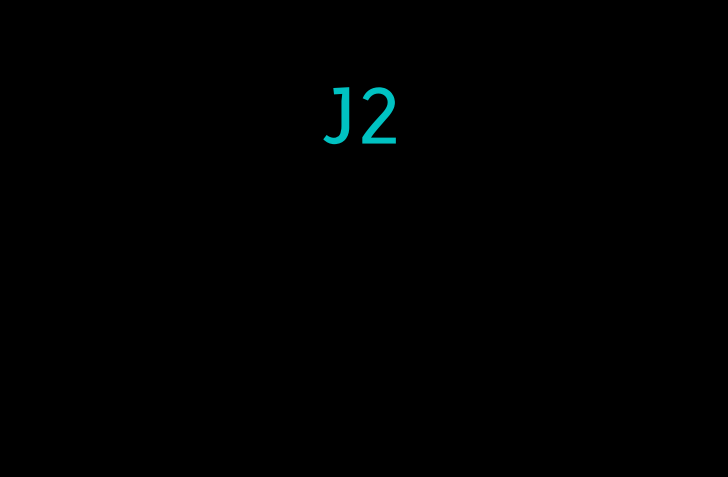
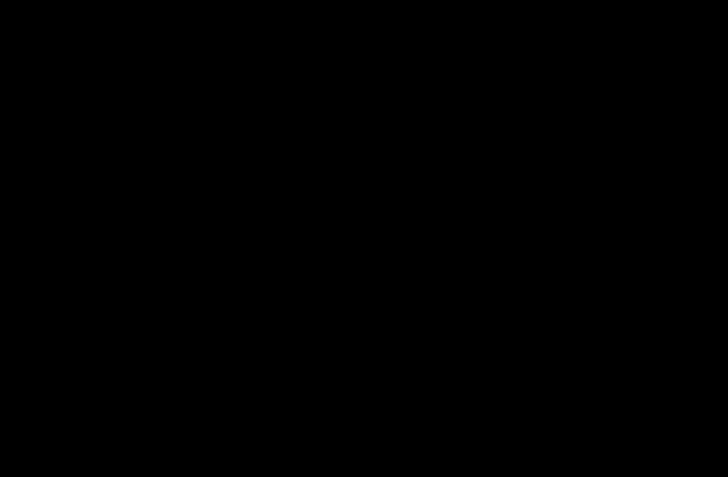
text: J2 (359, 115) -> none

